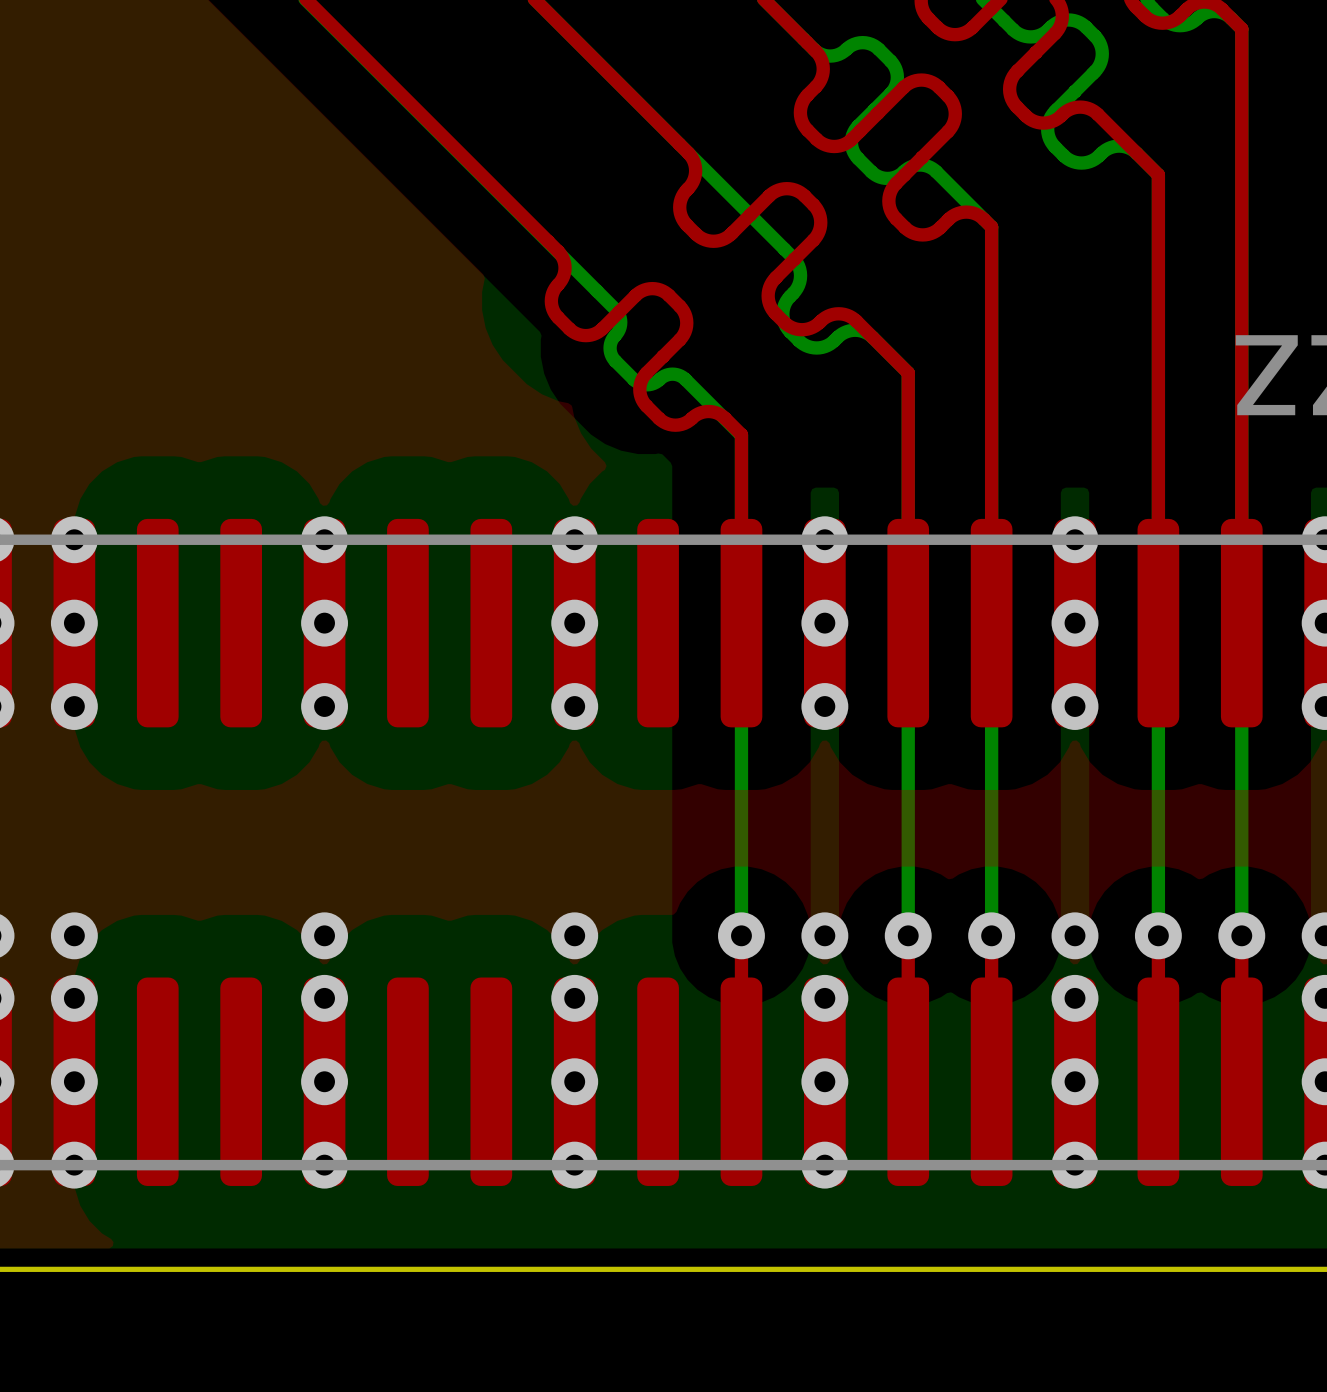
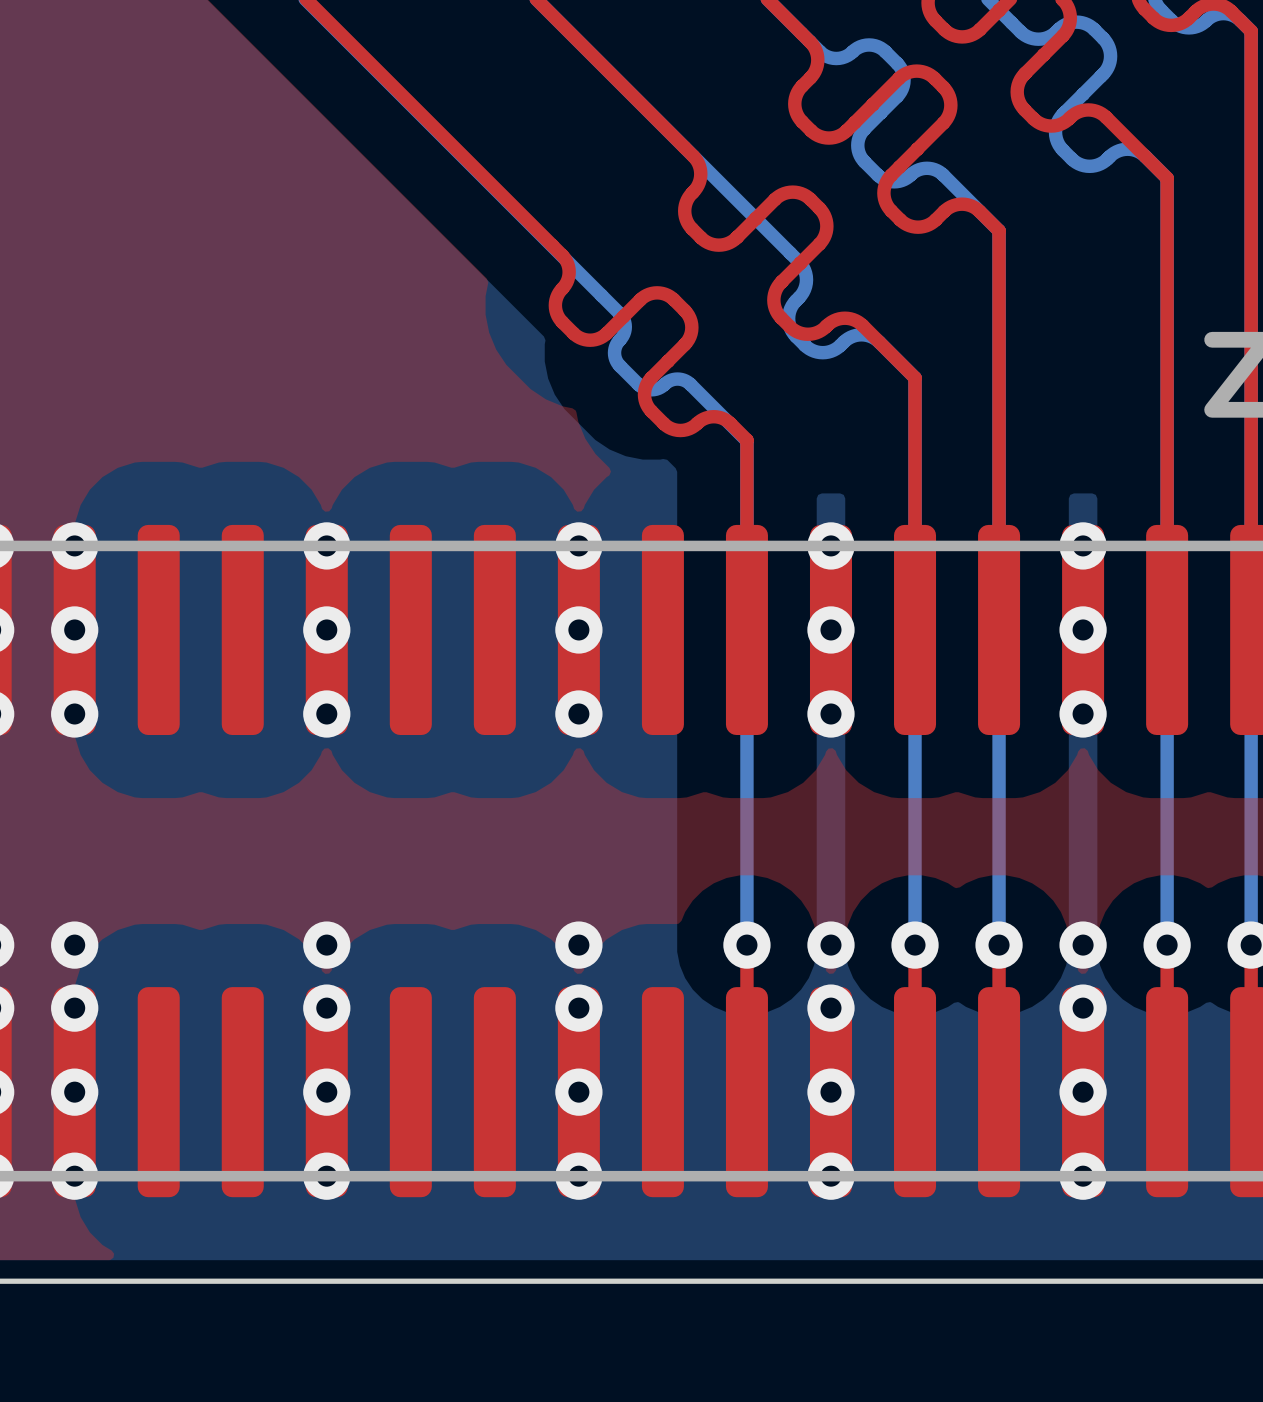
top track: (804, 39) (819, 55) (823, 66) (820, 79) (804, 99) (800, 109) (802, 123) (816, 139) (828, 145) (845, 144) (908, 83) (921, 80) (932, 82) (952, 103) (955, 111) (953, 122) (947, 131) (894, 185) (889, 197) (890, 210) (907, 229) (919, 234) (933, 232) (950, 217) (960, 212) (974, 213) (983, 219) -> (810, 42) (817, 54) (817, 65) (812, 75) (797, 93) (794, 106) (800, 119) (813, 132) (820, 136) (834, 137) (844, 132) (898, 78) (908, 72) (916, 71) (927, 73) (948, 94) (950, 108) (947, 118) (886, 182) (884, 195) (891, 210) (907, 224) (920, 227) (931, 223) (951, 206) (964, 204) (975, 208) (991, 223)

